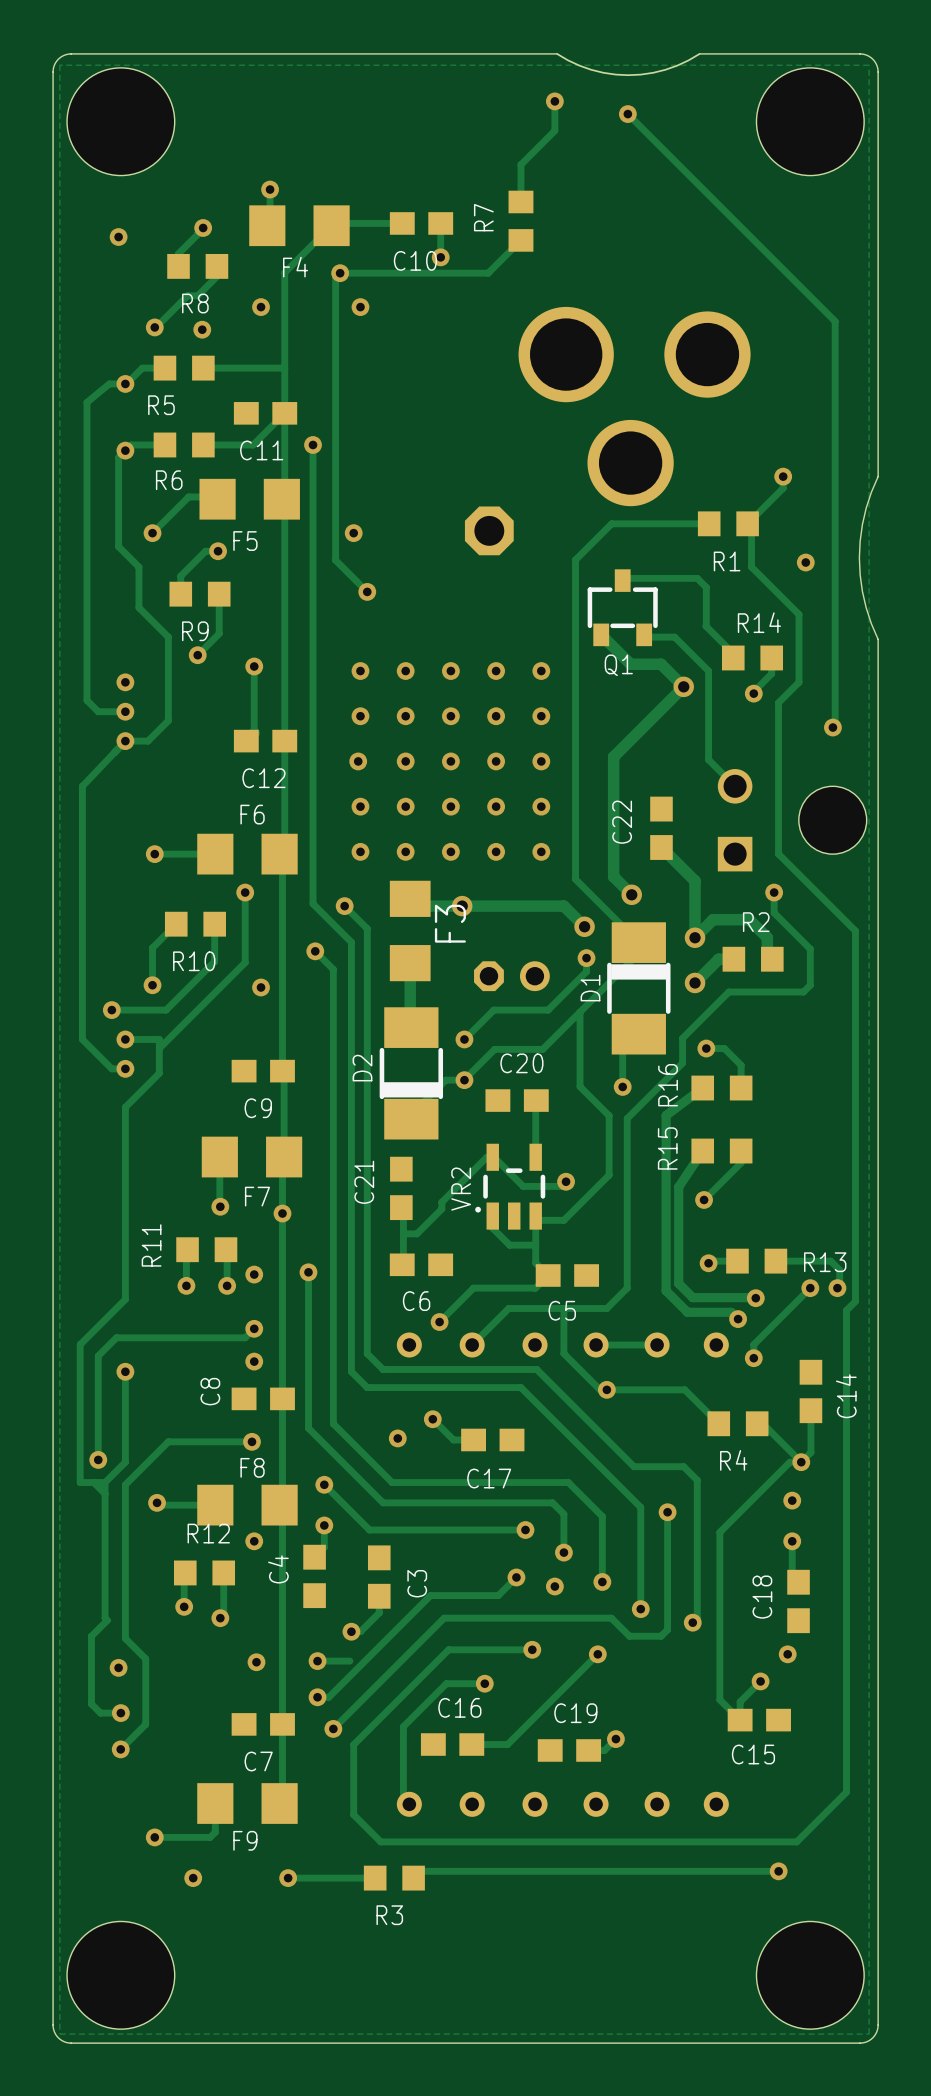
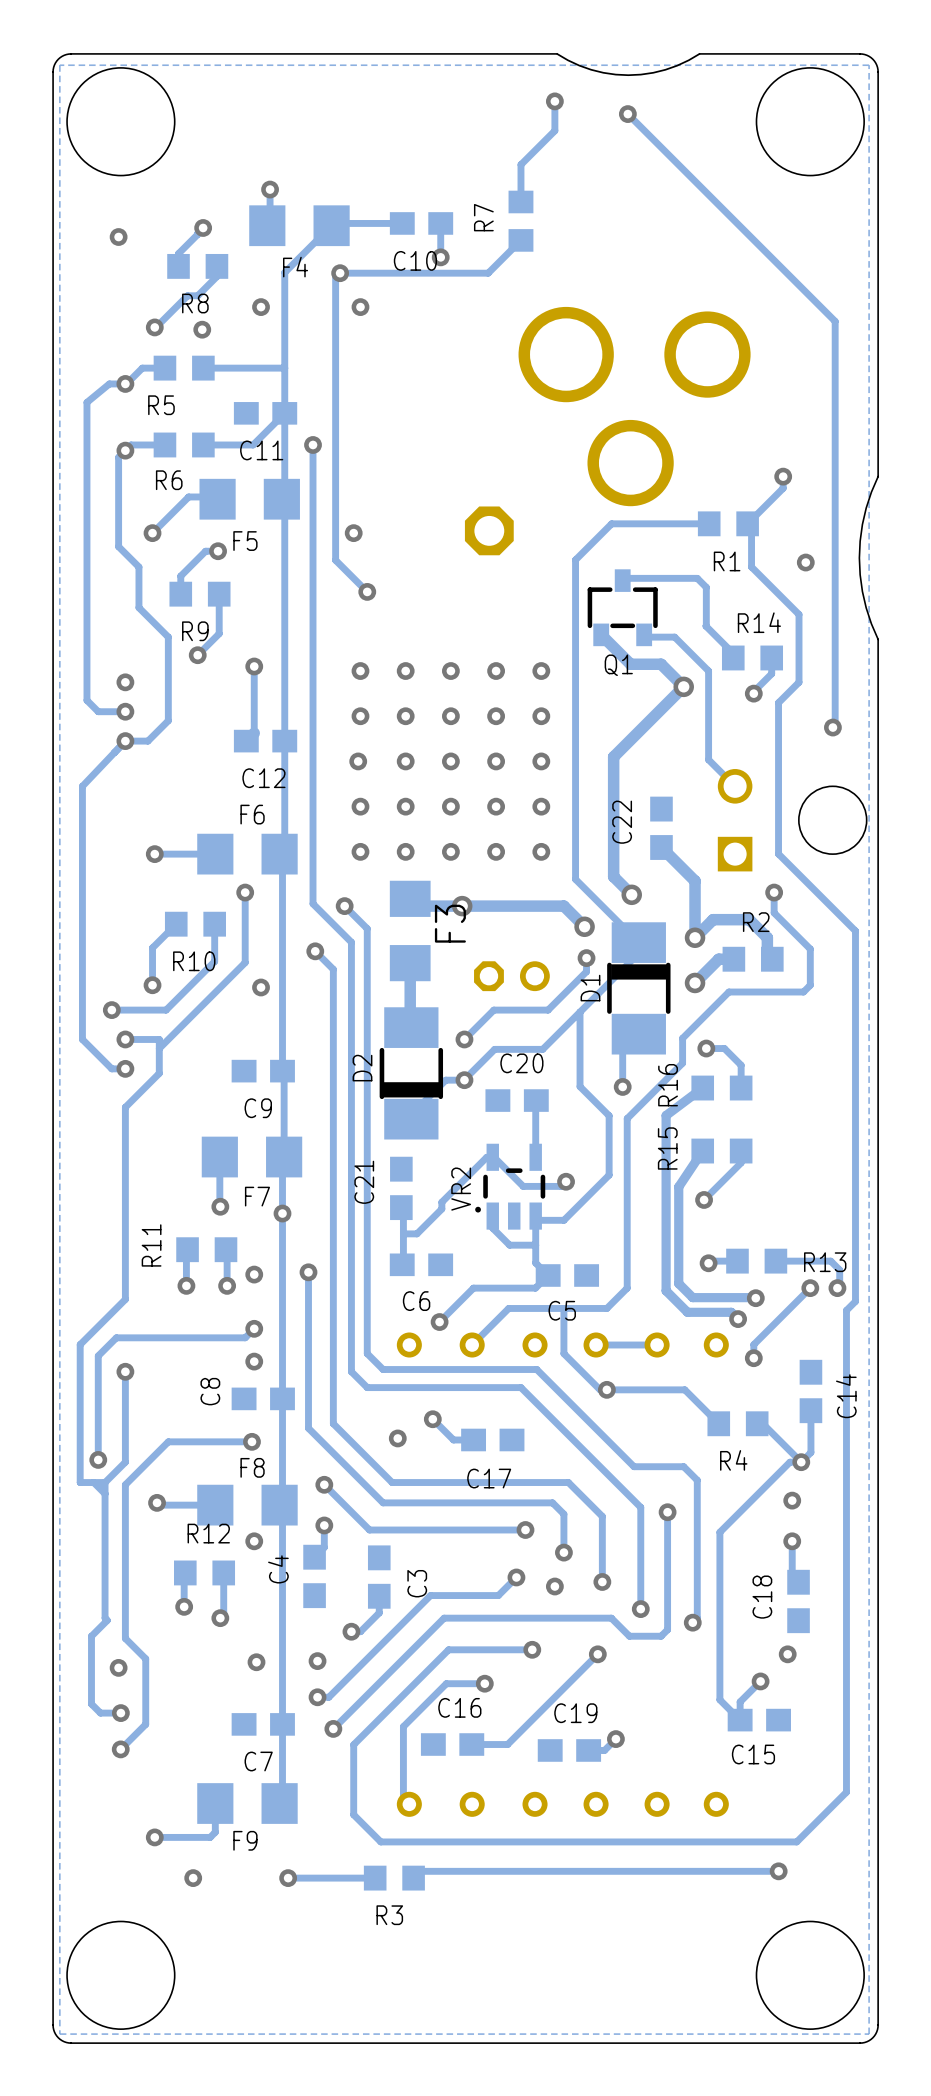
track: (349, 1661) (317, 1661) -> none

